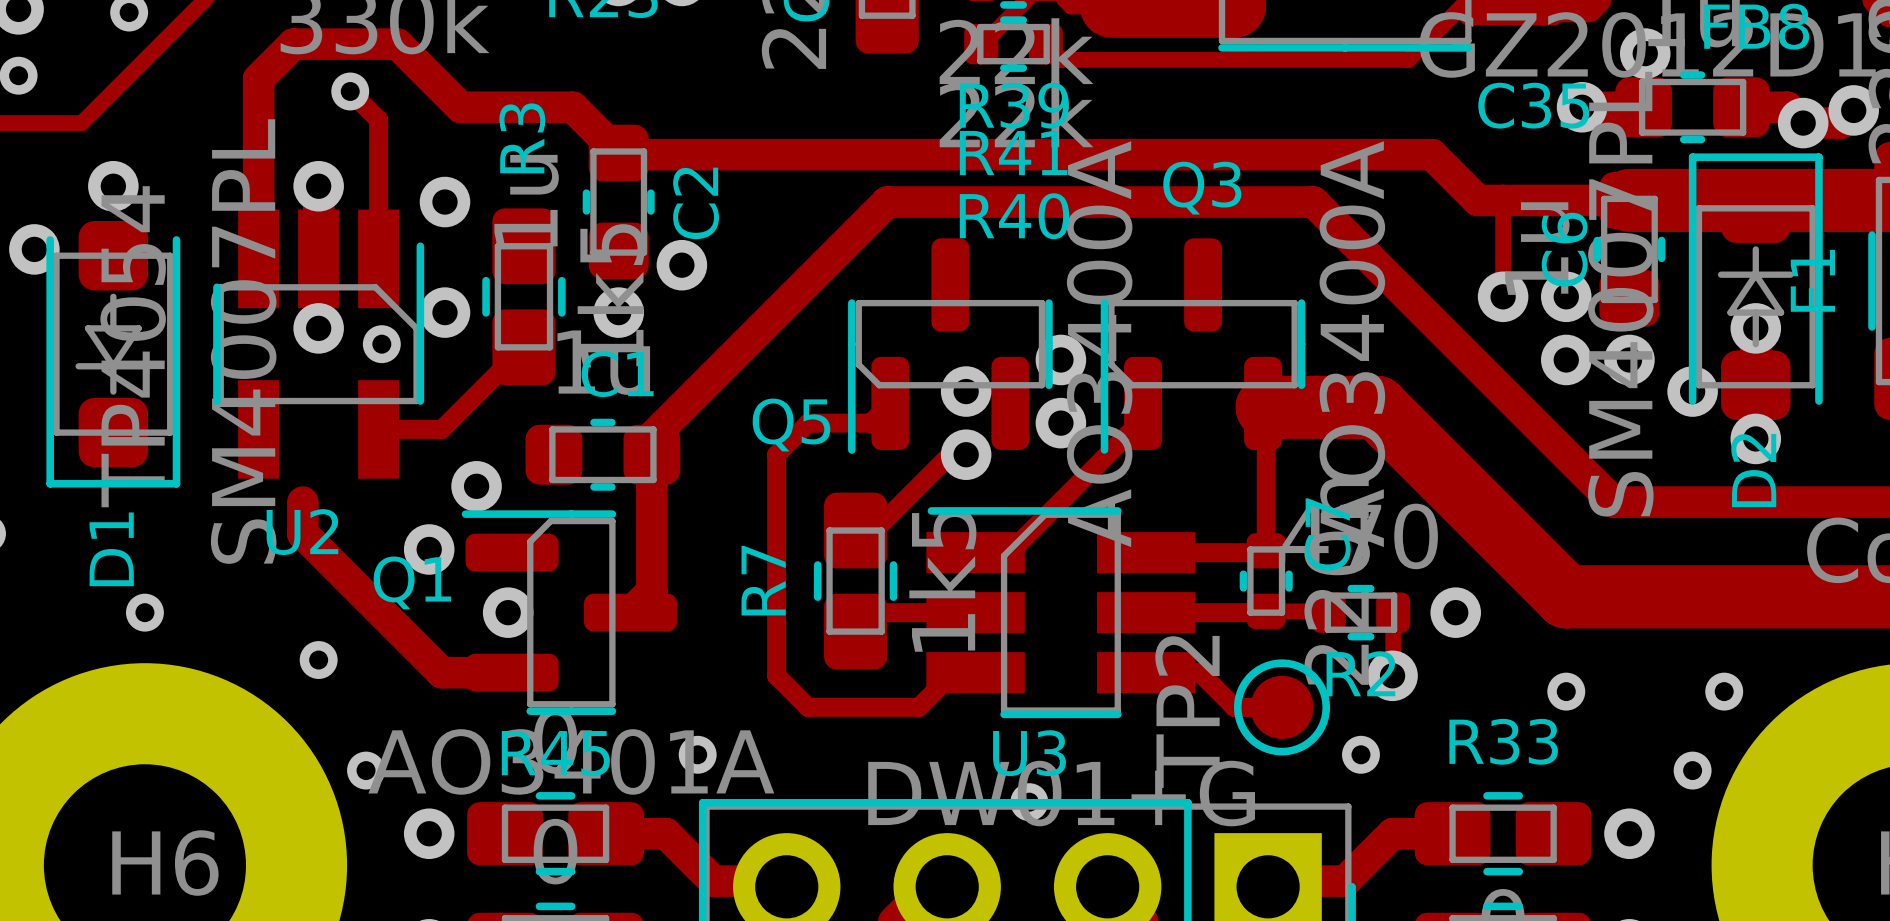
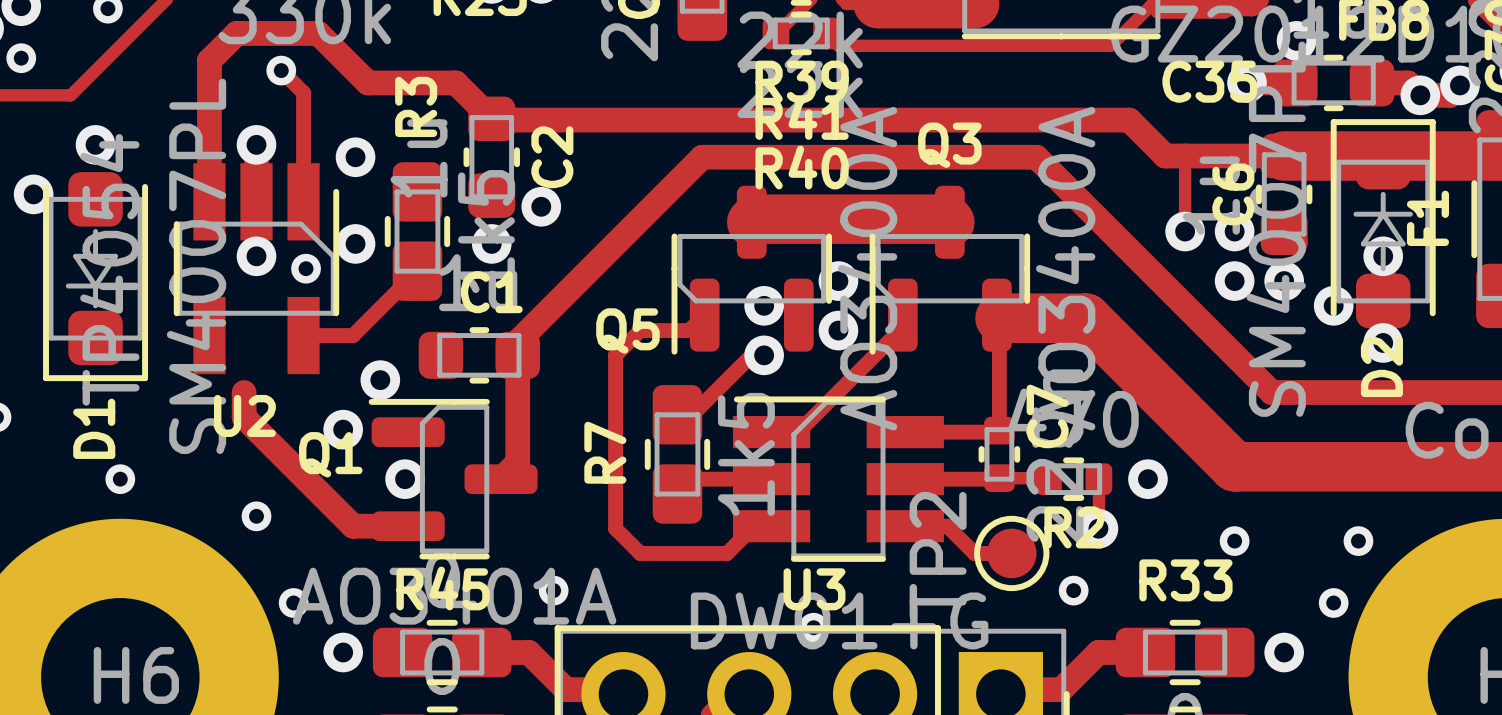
track: none -> (751, 222) (754, 219) (946, 219) (949, 222)

